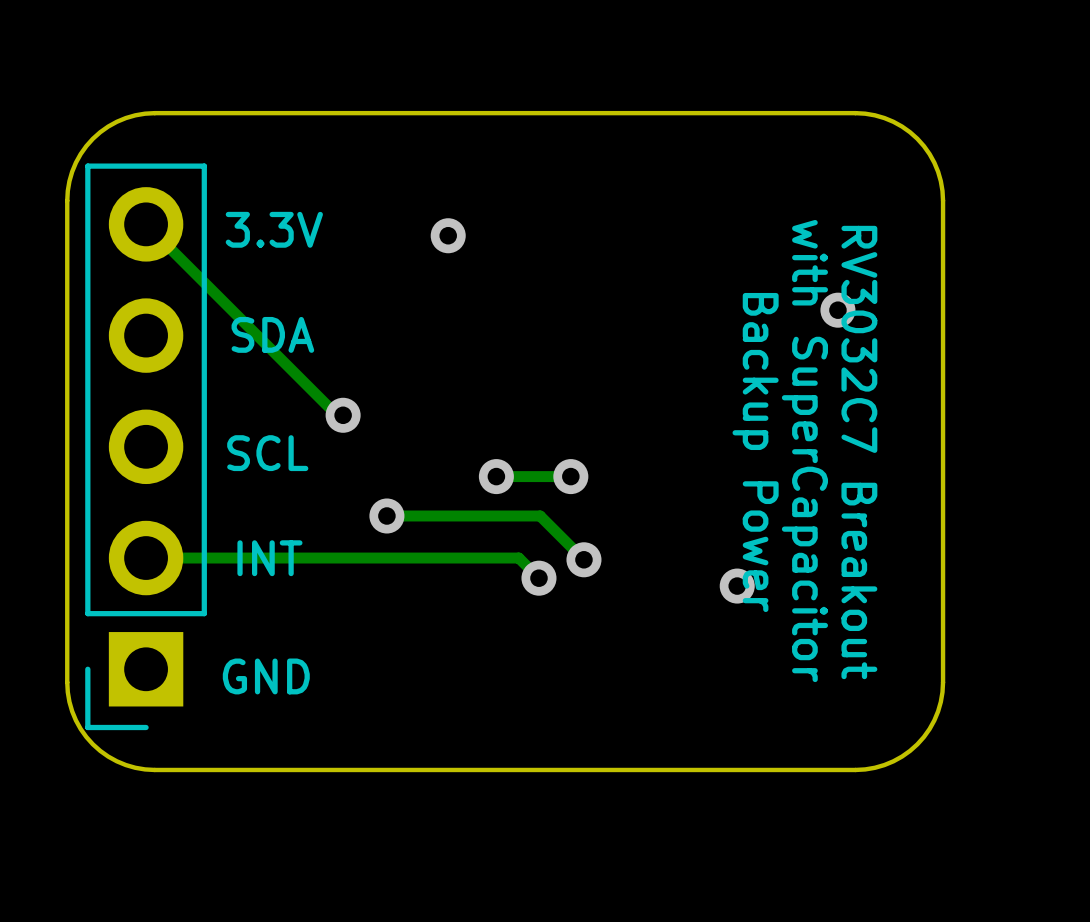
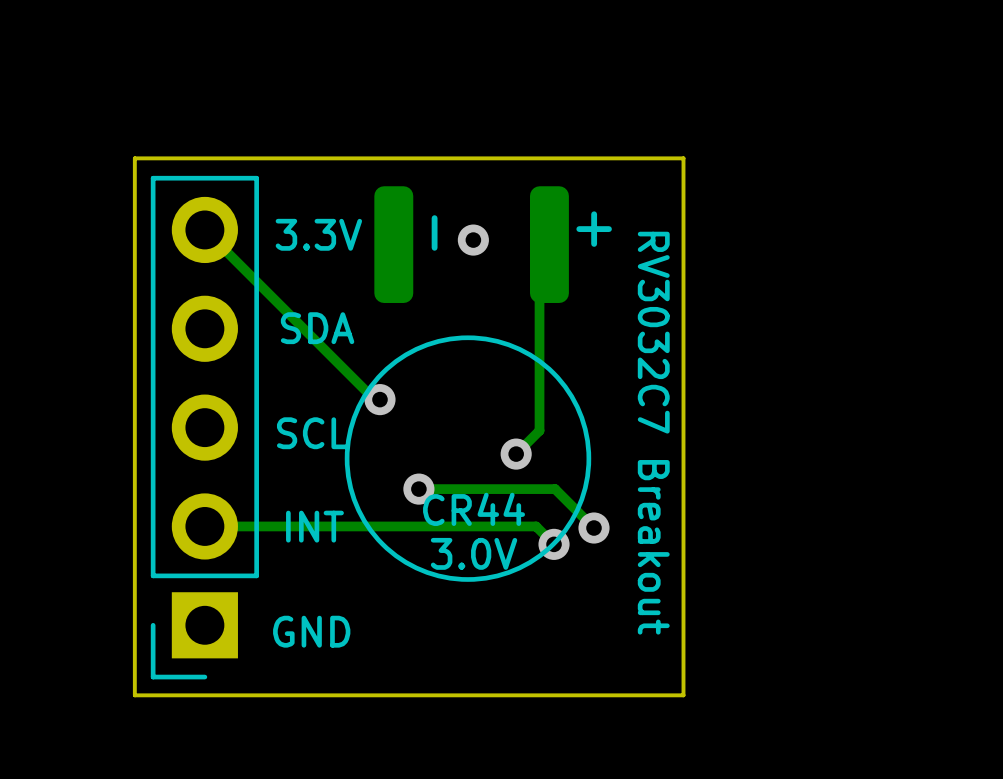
board edge: (67, 200) (72, 171) (80, 154) (92, 138) (116, 121) (135, 115) (154, 113) (865, 113) (893, 121) (910, 132) (923, 146) (938, 171) (943, 200) (942, 692) (938, 711) (929, 728) (910, 750) (893, 761) (874, 767) (855, 769) (145, 769) (116, 761) (92, 744) (75, 720) (69, 701) (67, 682) -> (134, 208) (134, 158) (683, 158) (683, 695) (134, 695) (134, 636)
via: (837, 310) -> none
part: none -> (467, 384)
text: with SuperCapacitor (804, 451) -> none
text: Backup Power (755, 452) -> none
text position: RV3032C7 Breakout (859, 452) -> RV3032C7 Breakout (653, 433)
track: (570, 476) (496, 476) -> (539, 259) (539, 430) (516, 454)
via: (570, 476) -> none
text: none -> CR44 (474, 509)
via: (737, 586) -> none
text: none -> 3.0V (474, 553)

